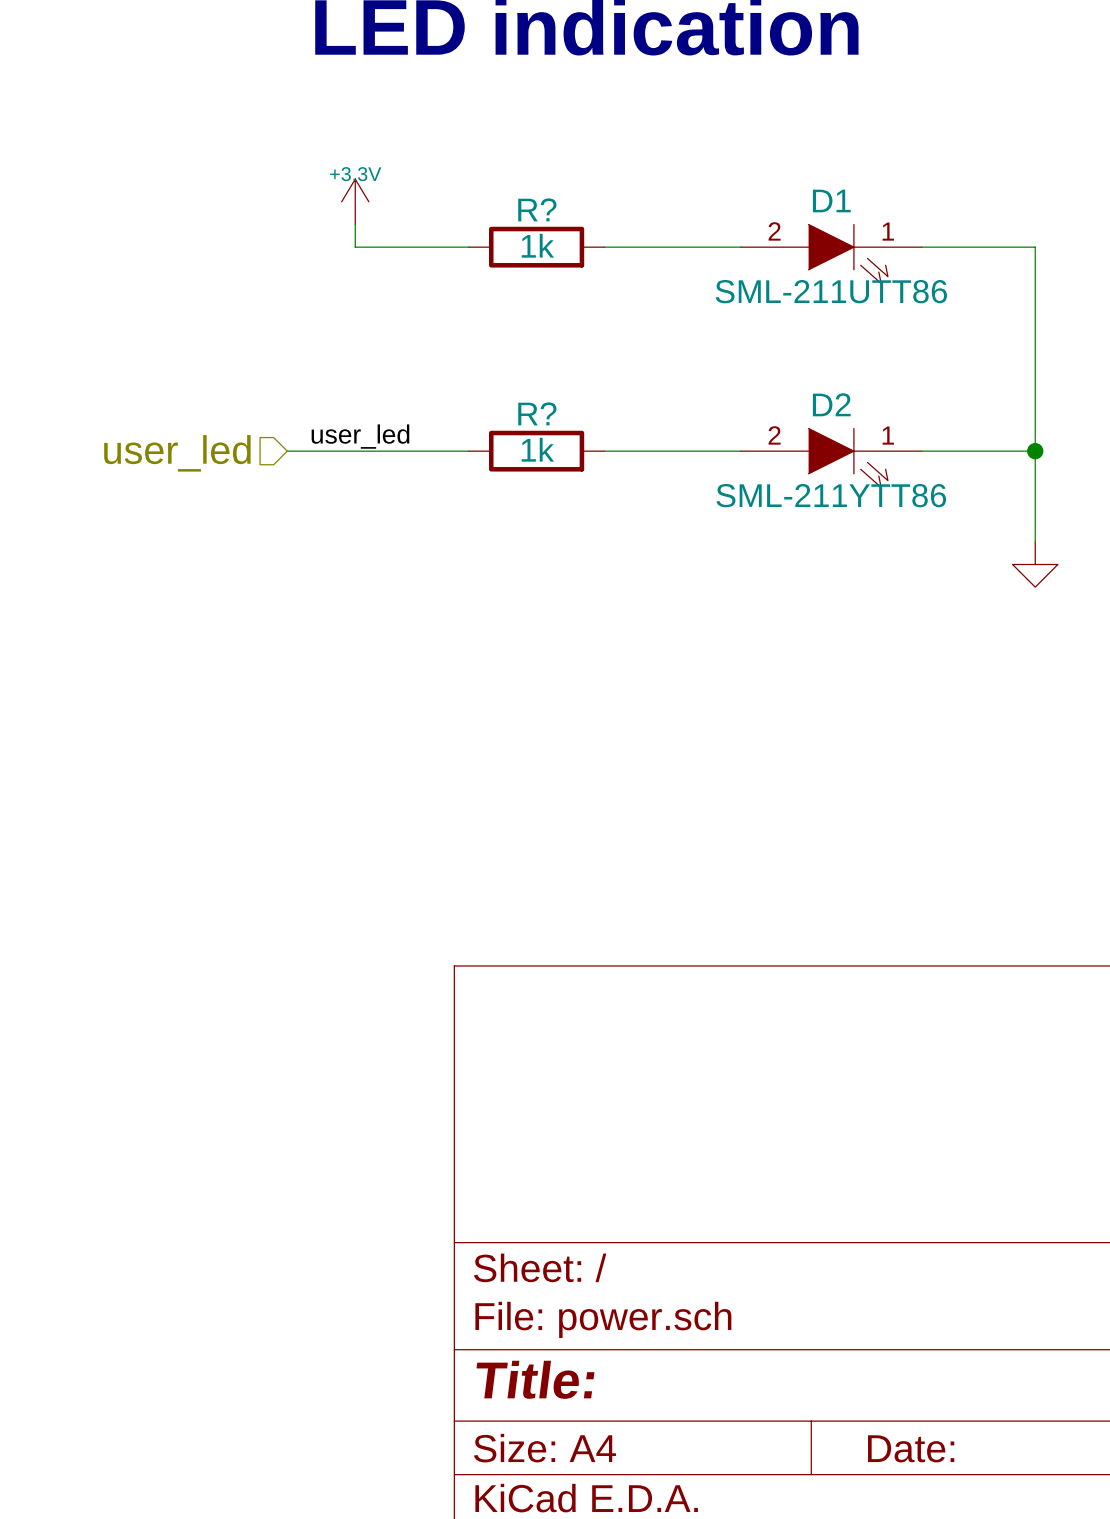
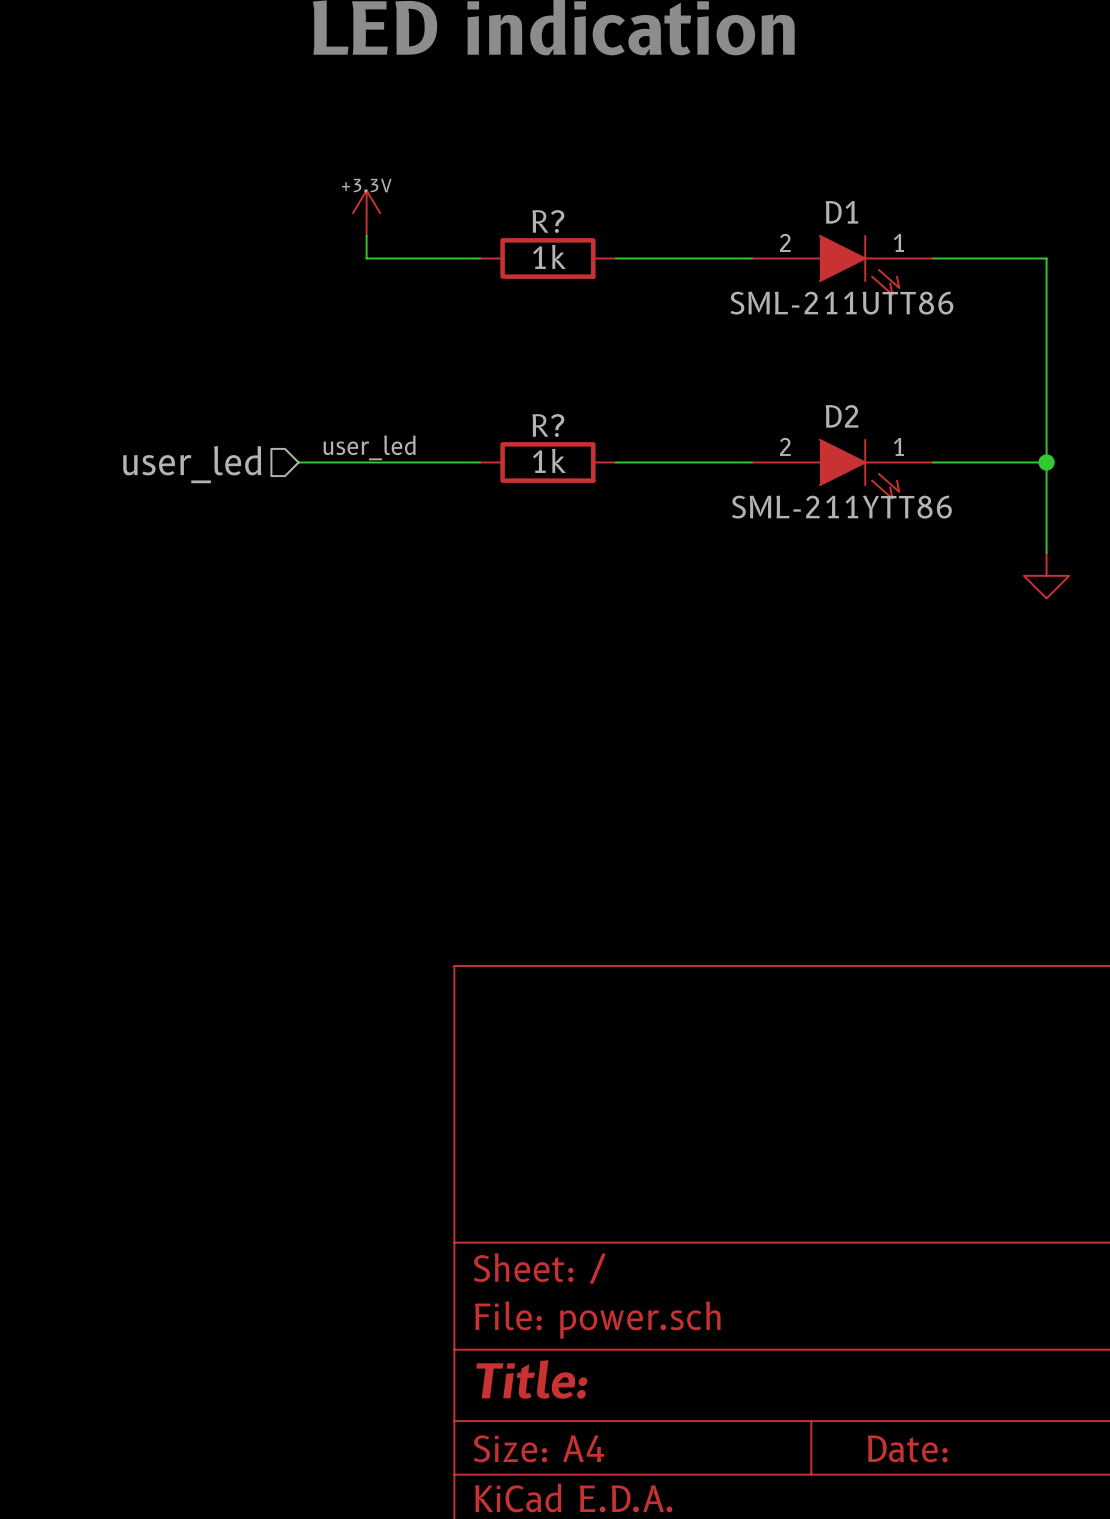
power symbol position: +3.3V (355, 201) -> +3.3V (366, 213)
wire: (355, 224) (355, 247) (468, 247) -> (366, 235) (366, 258) (479, 258)
R? position: (536, 247) -> (547, 258)
wire: (604, 247) (740, 247) -> (615, 258) (751, 258)
wire: (921, 247) (1035, 247) (1035, 541) -> (933, 258) (1046, 258) (1046, 553)
D1 position: (831, 253) -> (842, 265)
label position: user_led (360, 436) -> user_led (369, 447)
wire: (287, 451) (468, 451) -> (298, 462) (479, 462)
R? position: (536, 451) -> (547, 462)
wire: (604, 451) (740, 451) -> (615, 462) (751, 462)
wire: (921, 451) (1035, 451) -> (933, 462) (1046, 462)
junction position: (1035, 451) -> (1046, 462)
hierarchical label position: user_led (177, 453) -> user_led (192, 464)
D2 position: (831, 457) -> (842, 469)
power symbol position: (1035, 564) -> (1046, 575)

